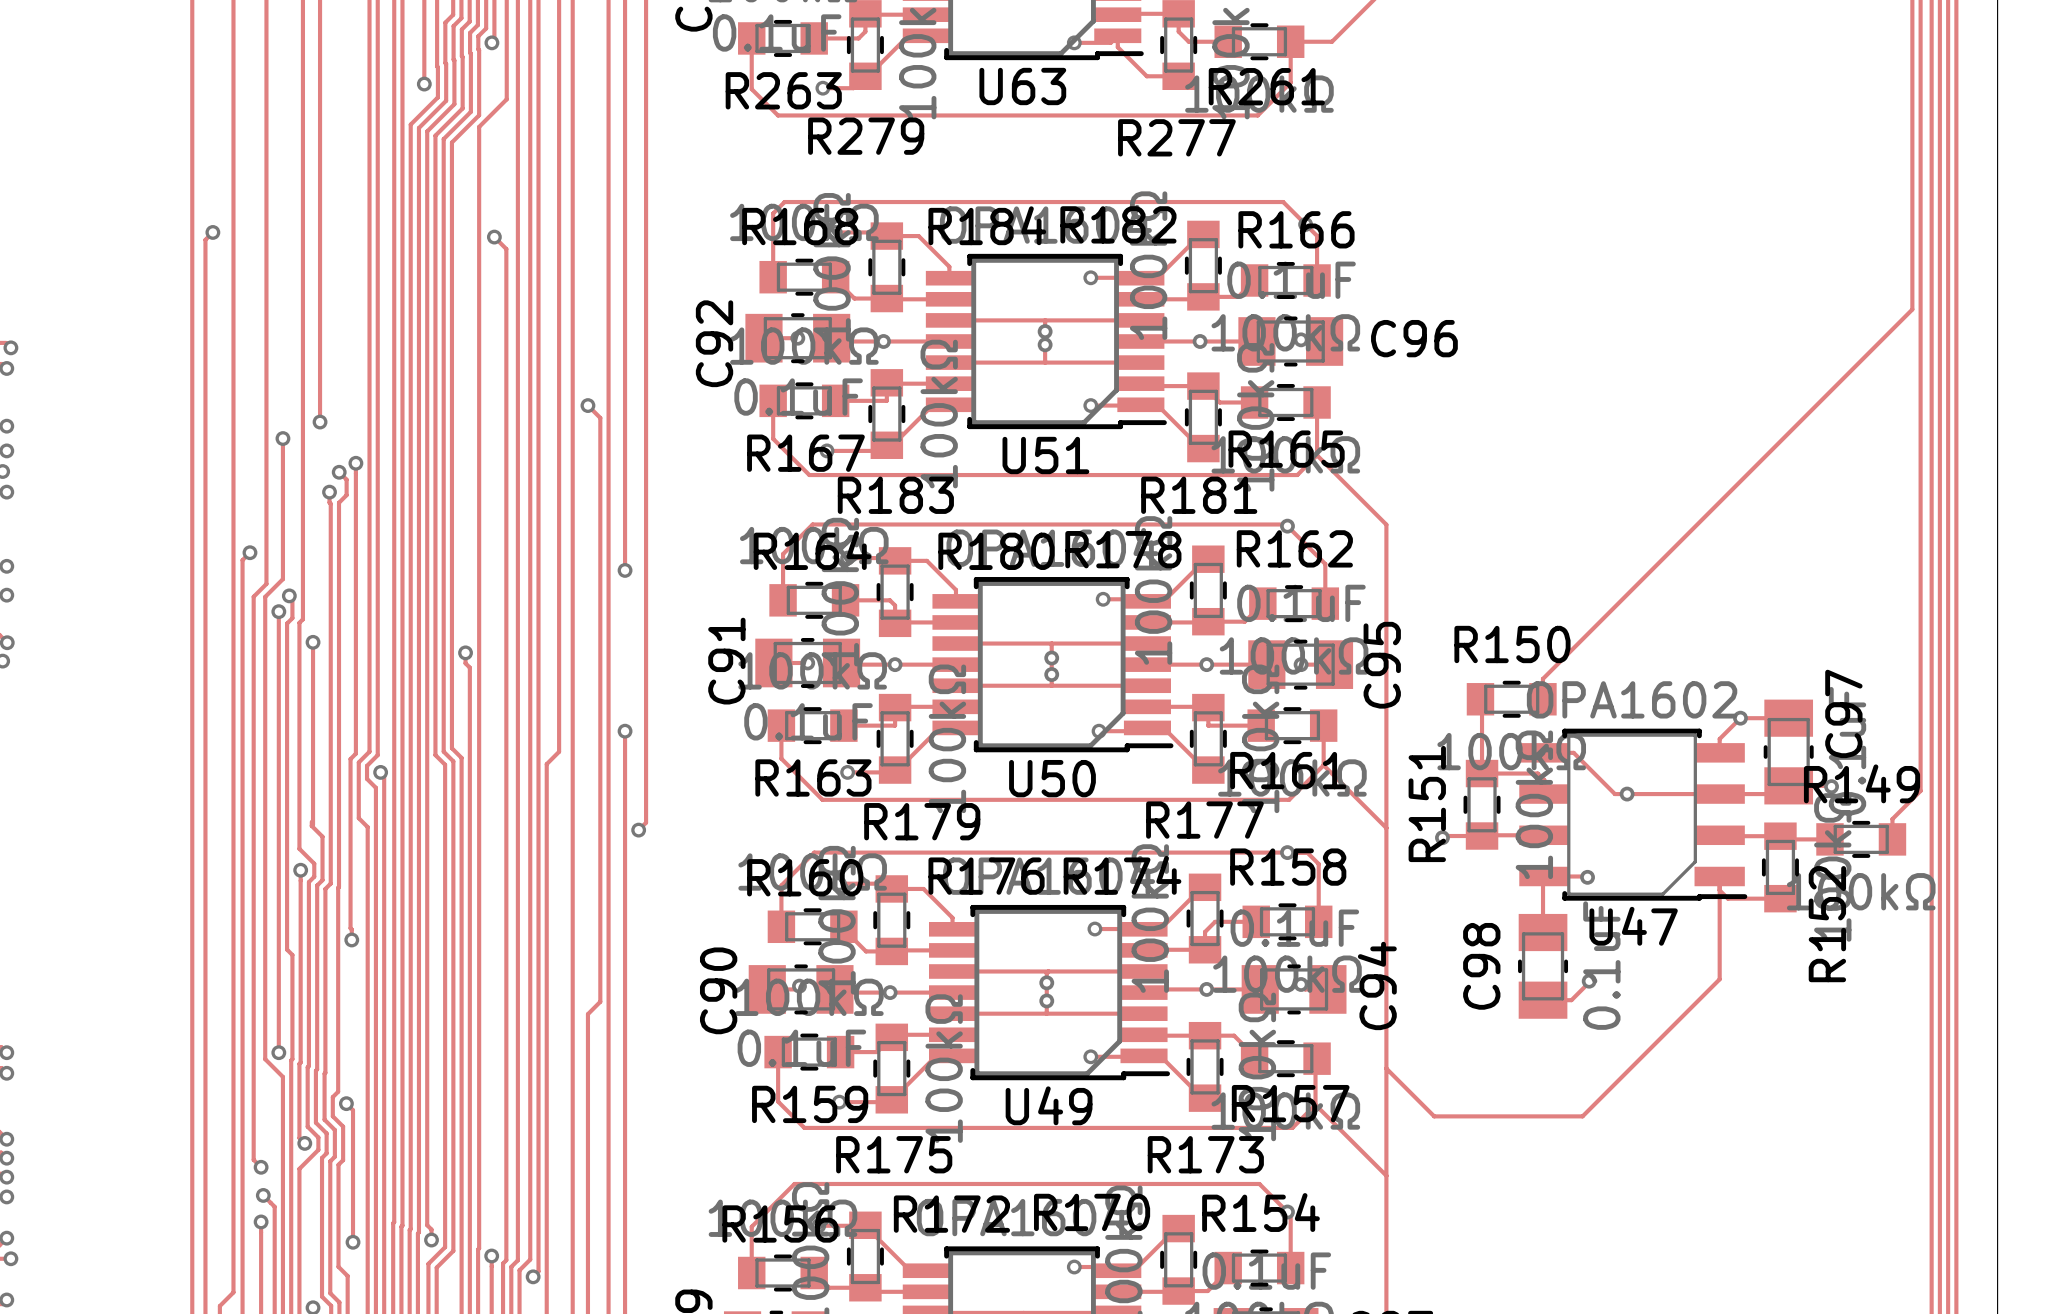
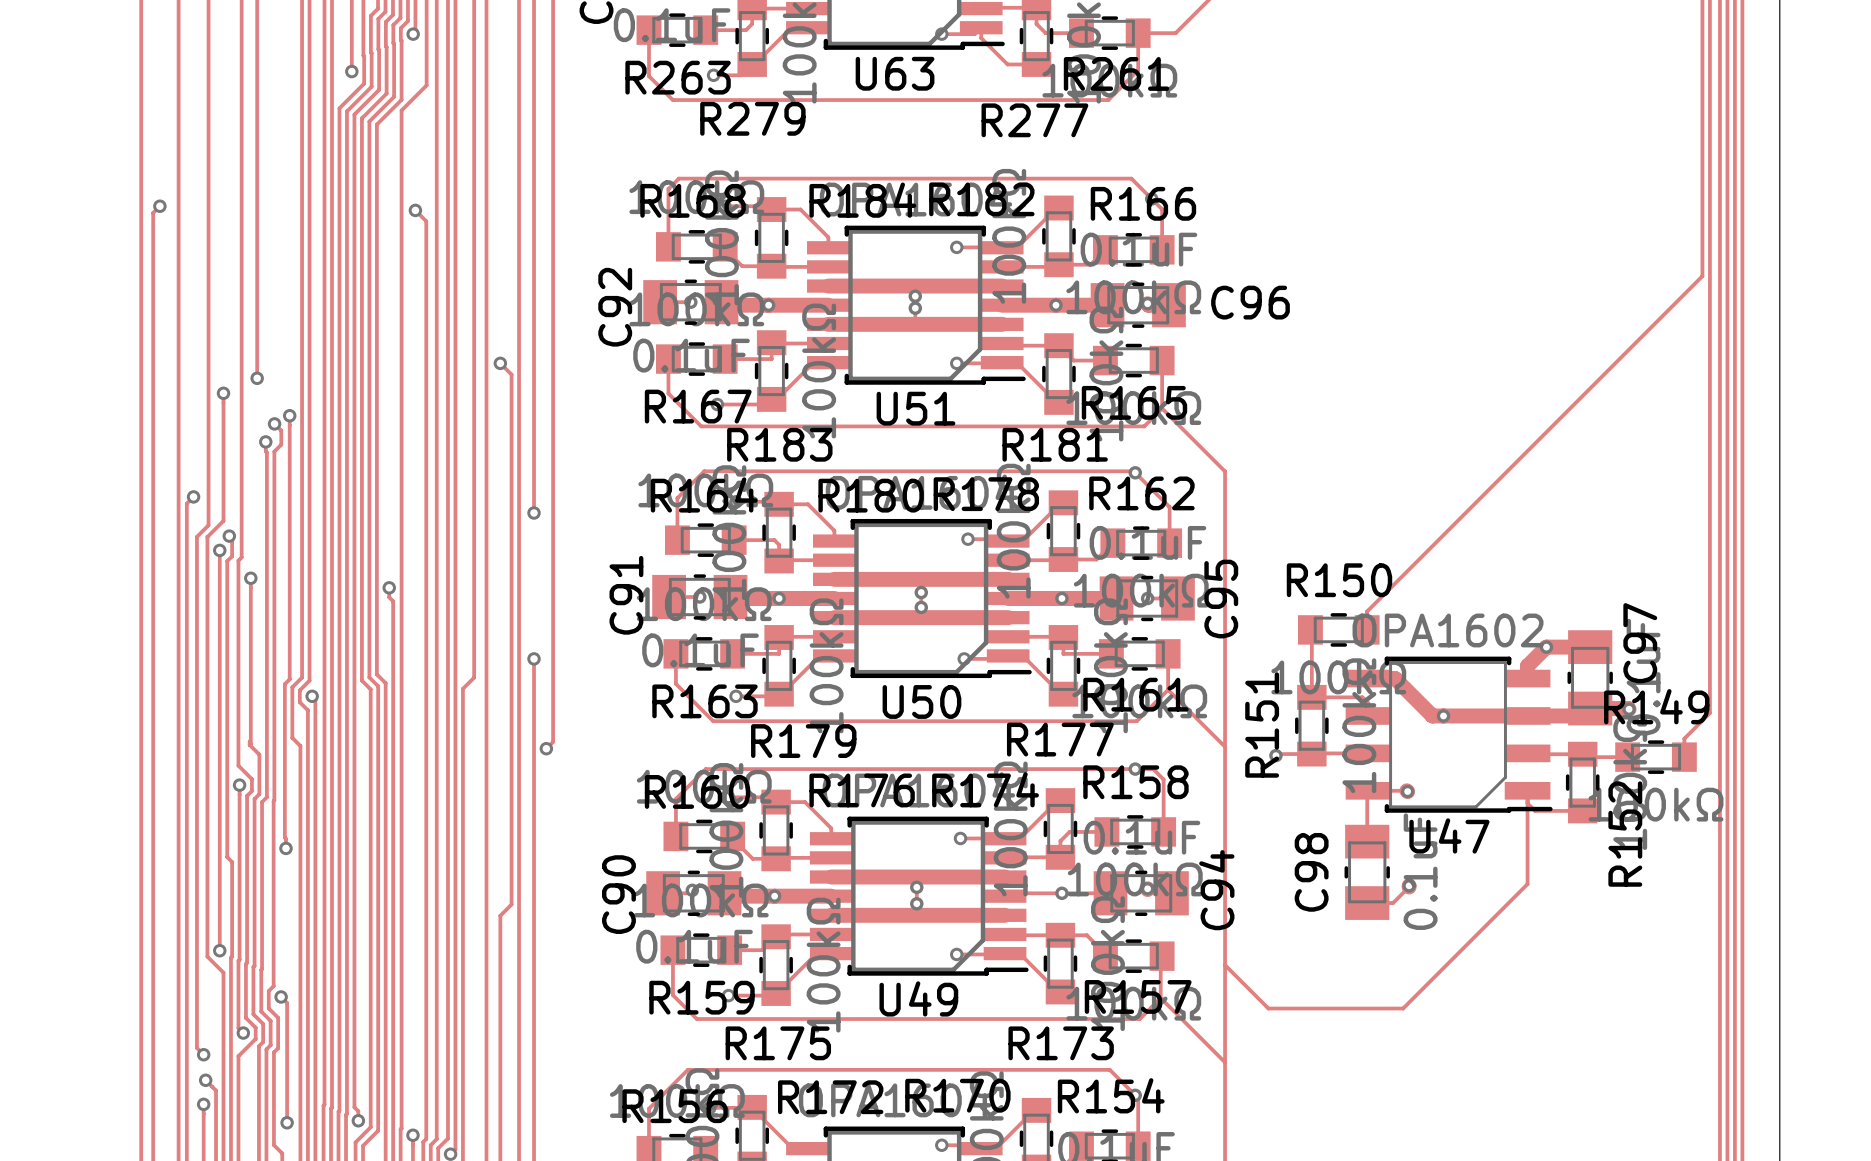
track width: thin (949, 320) (1140, 320) -> thick (828, 286) (1002, 286)
track width: thin (831, 338) (834, 341) (949, 341) -> thick (721, 302) (724, 305) (828, 305)
track width: thin (1140, 341) (1256, 341) -> thick (1002, 305) (1107, 305)
track width: thin (949, 362) (1140, 362) -> thick (828, 324) (1002, 324)
track width: thin (955, 643) (1147, 643) -> thick (834, 579) (1008, 579)
track width: thin (841, 662) (843, 664) (955, 664) -> thick (730, 597) (834, 598)
track width: thin (1147, 664) (1266, 664) -> thick (1008, 598) (1116, 598)
track width: thin (955, 685) (1147, 685) -> thick (834, 617) (1008, 617)
track width: thin (1788, 718) (1740, 718) (1719, 738) (1719, 752) -> thick (1590, 647) (1546, 647) (1527, 665) (1527, 678)
track width: thin (1544, 752) (1573, 752) (1614, 794) (1780, 794) (1788, 785) (1831, 786) -> thick (1368, 678) (1395, 678) (1432, 715) (1582, 715) (1590, 708) (1629, 709)
track width: thin (952, 971) (1144, 971) -> thick (831, 877) (1005, 877)
track width: thin (834, 989) (838, 992) (952, 992) -> thick (724, 893) (727, 896) (831, 896)
track width: thin (952, 1013) (1144, 1013) -> thick (831, 915) (1005, 915)

